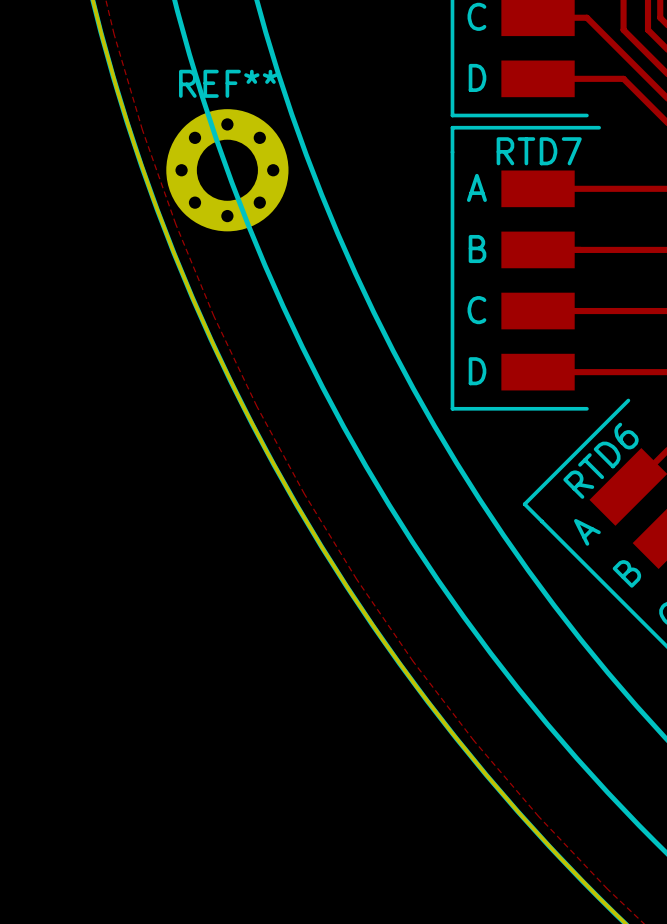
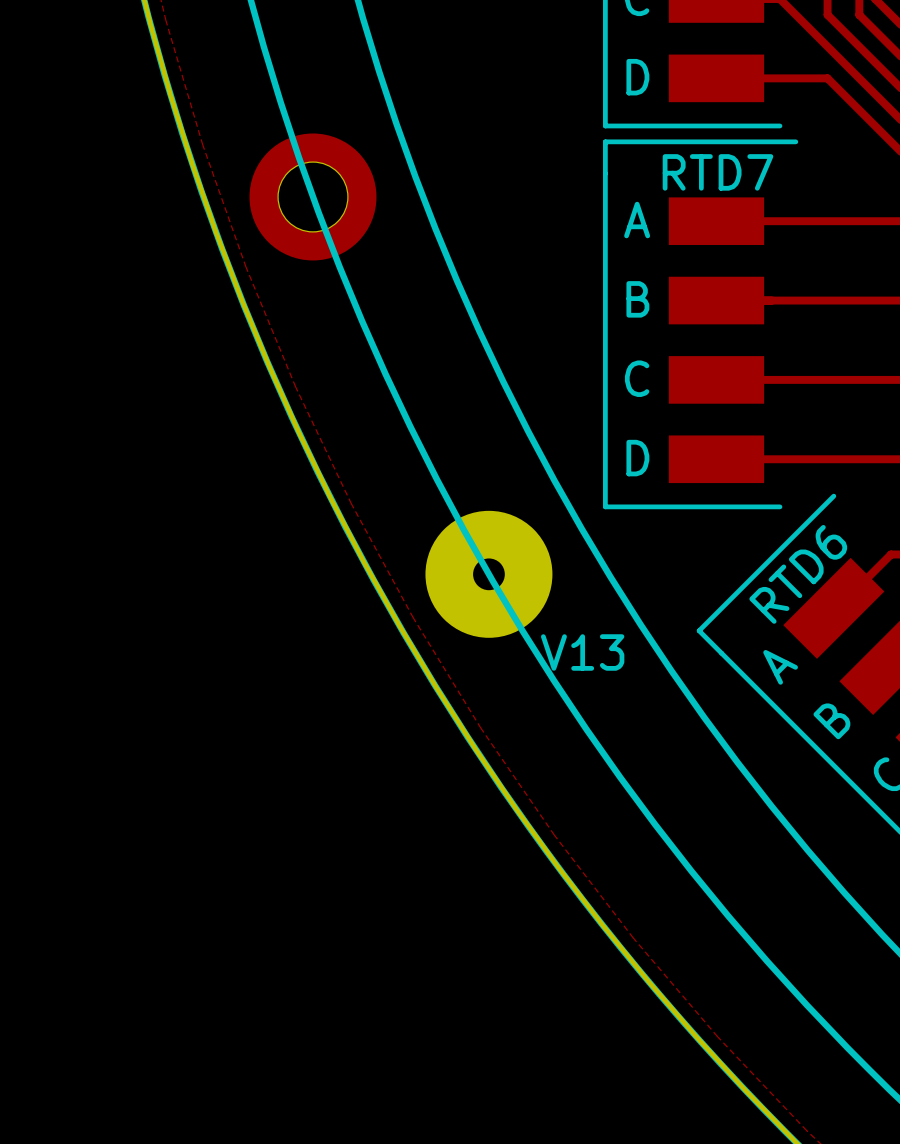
REF**: (227, 170) -> none
part: none -> (312, 196)
V13: none -> (488, 574)

